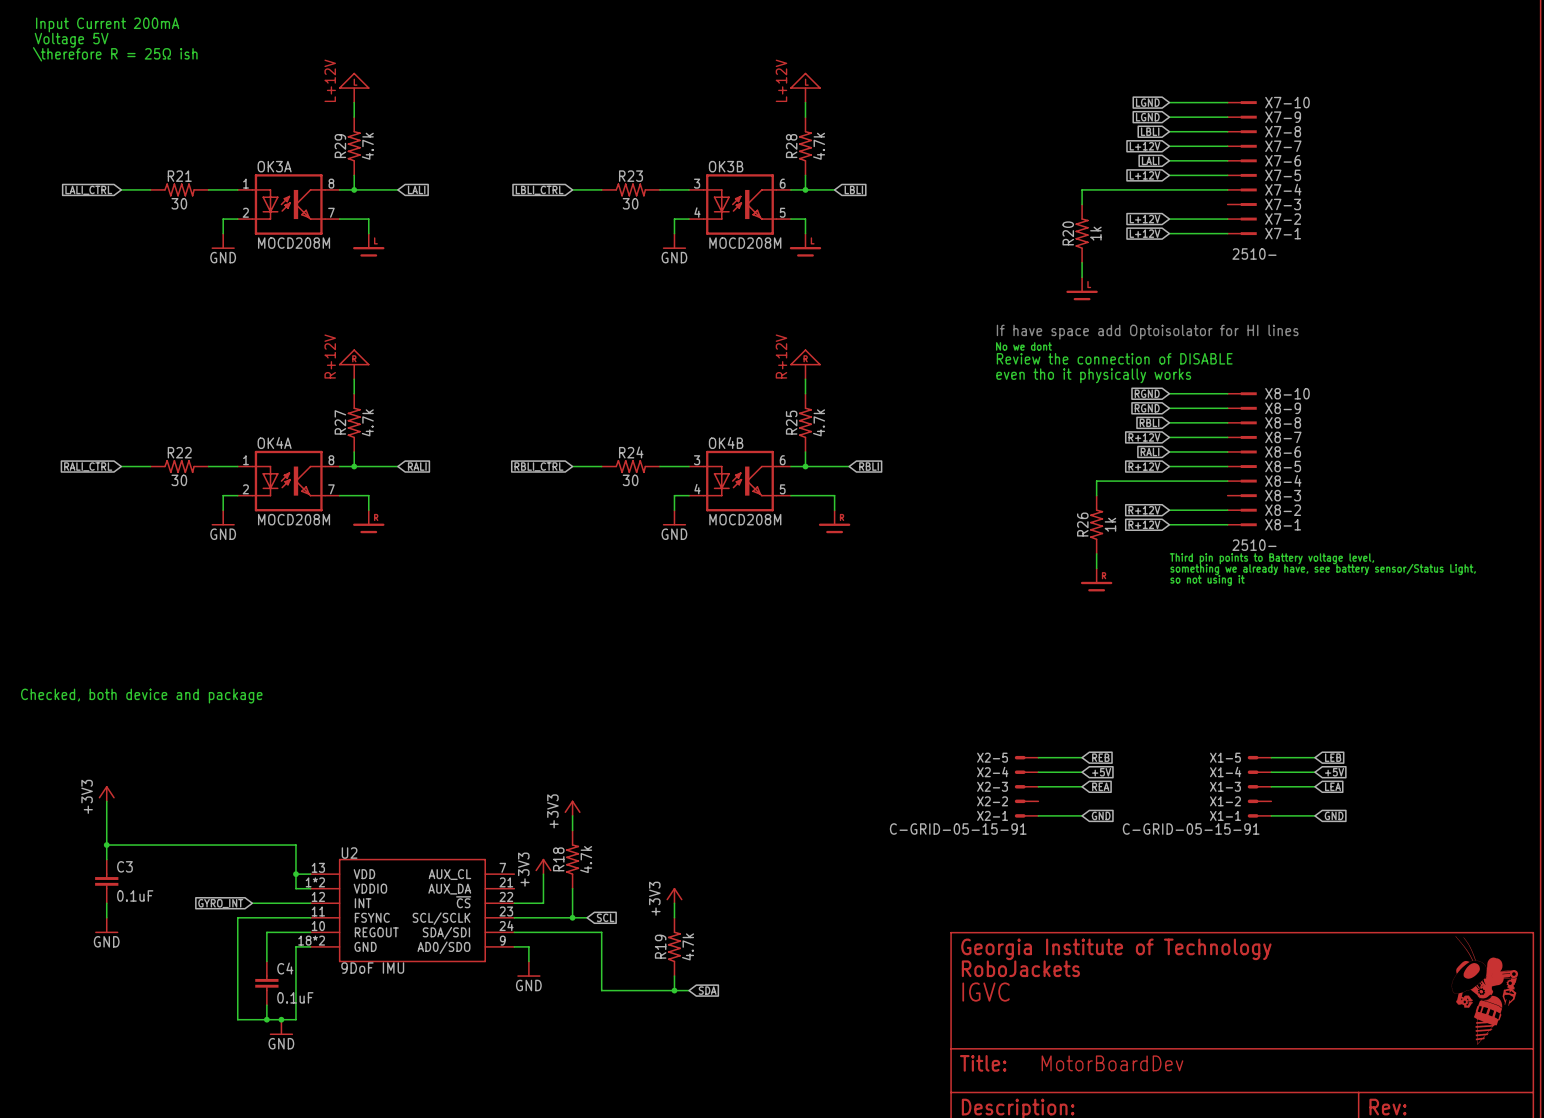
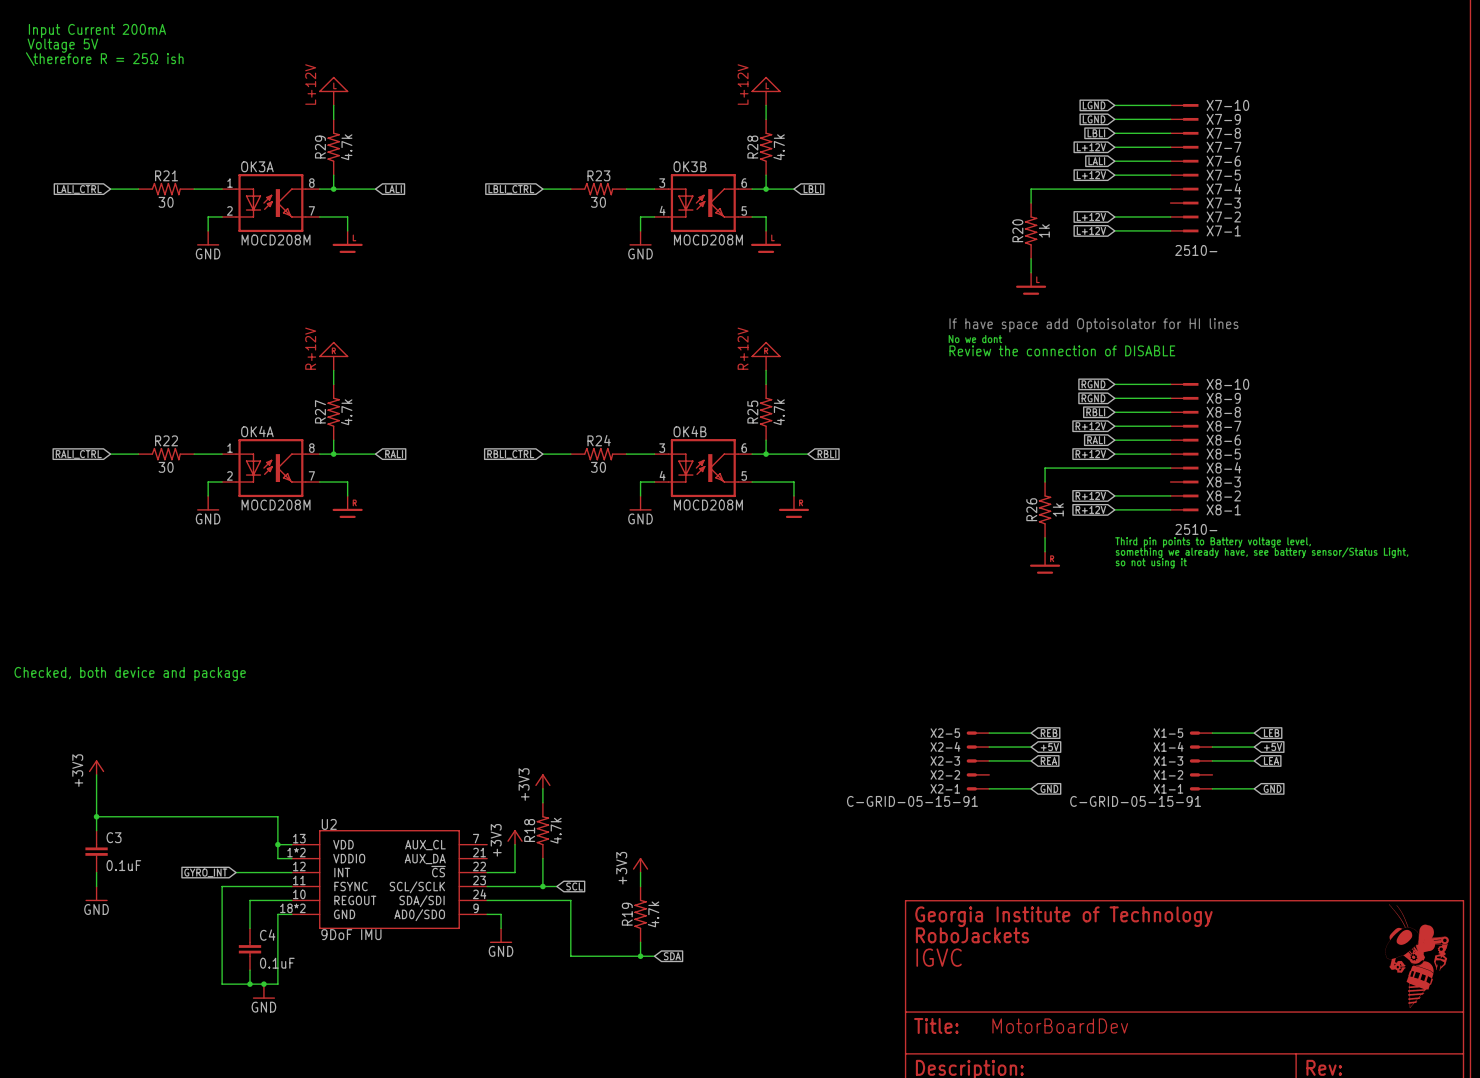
text: even tho it physically works (1093, 375) -> none

